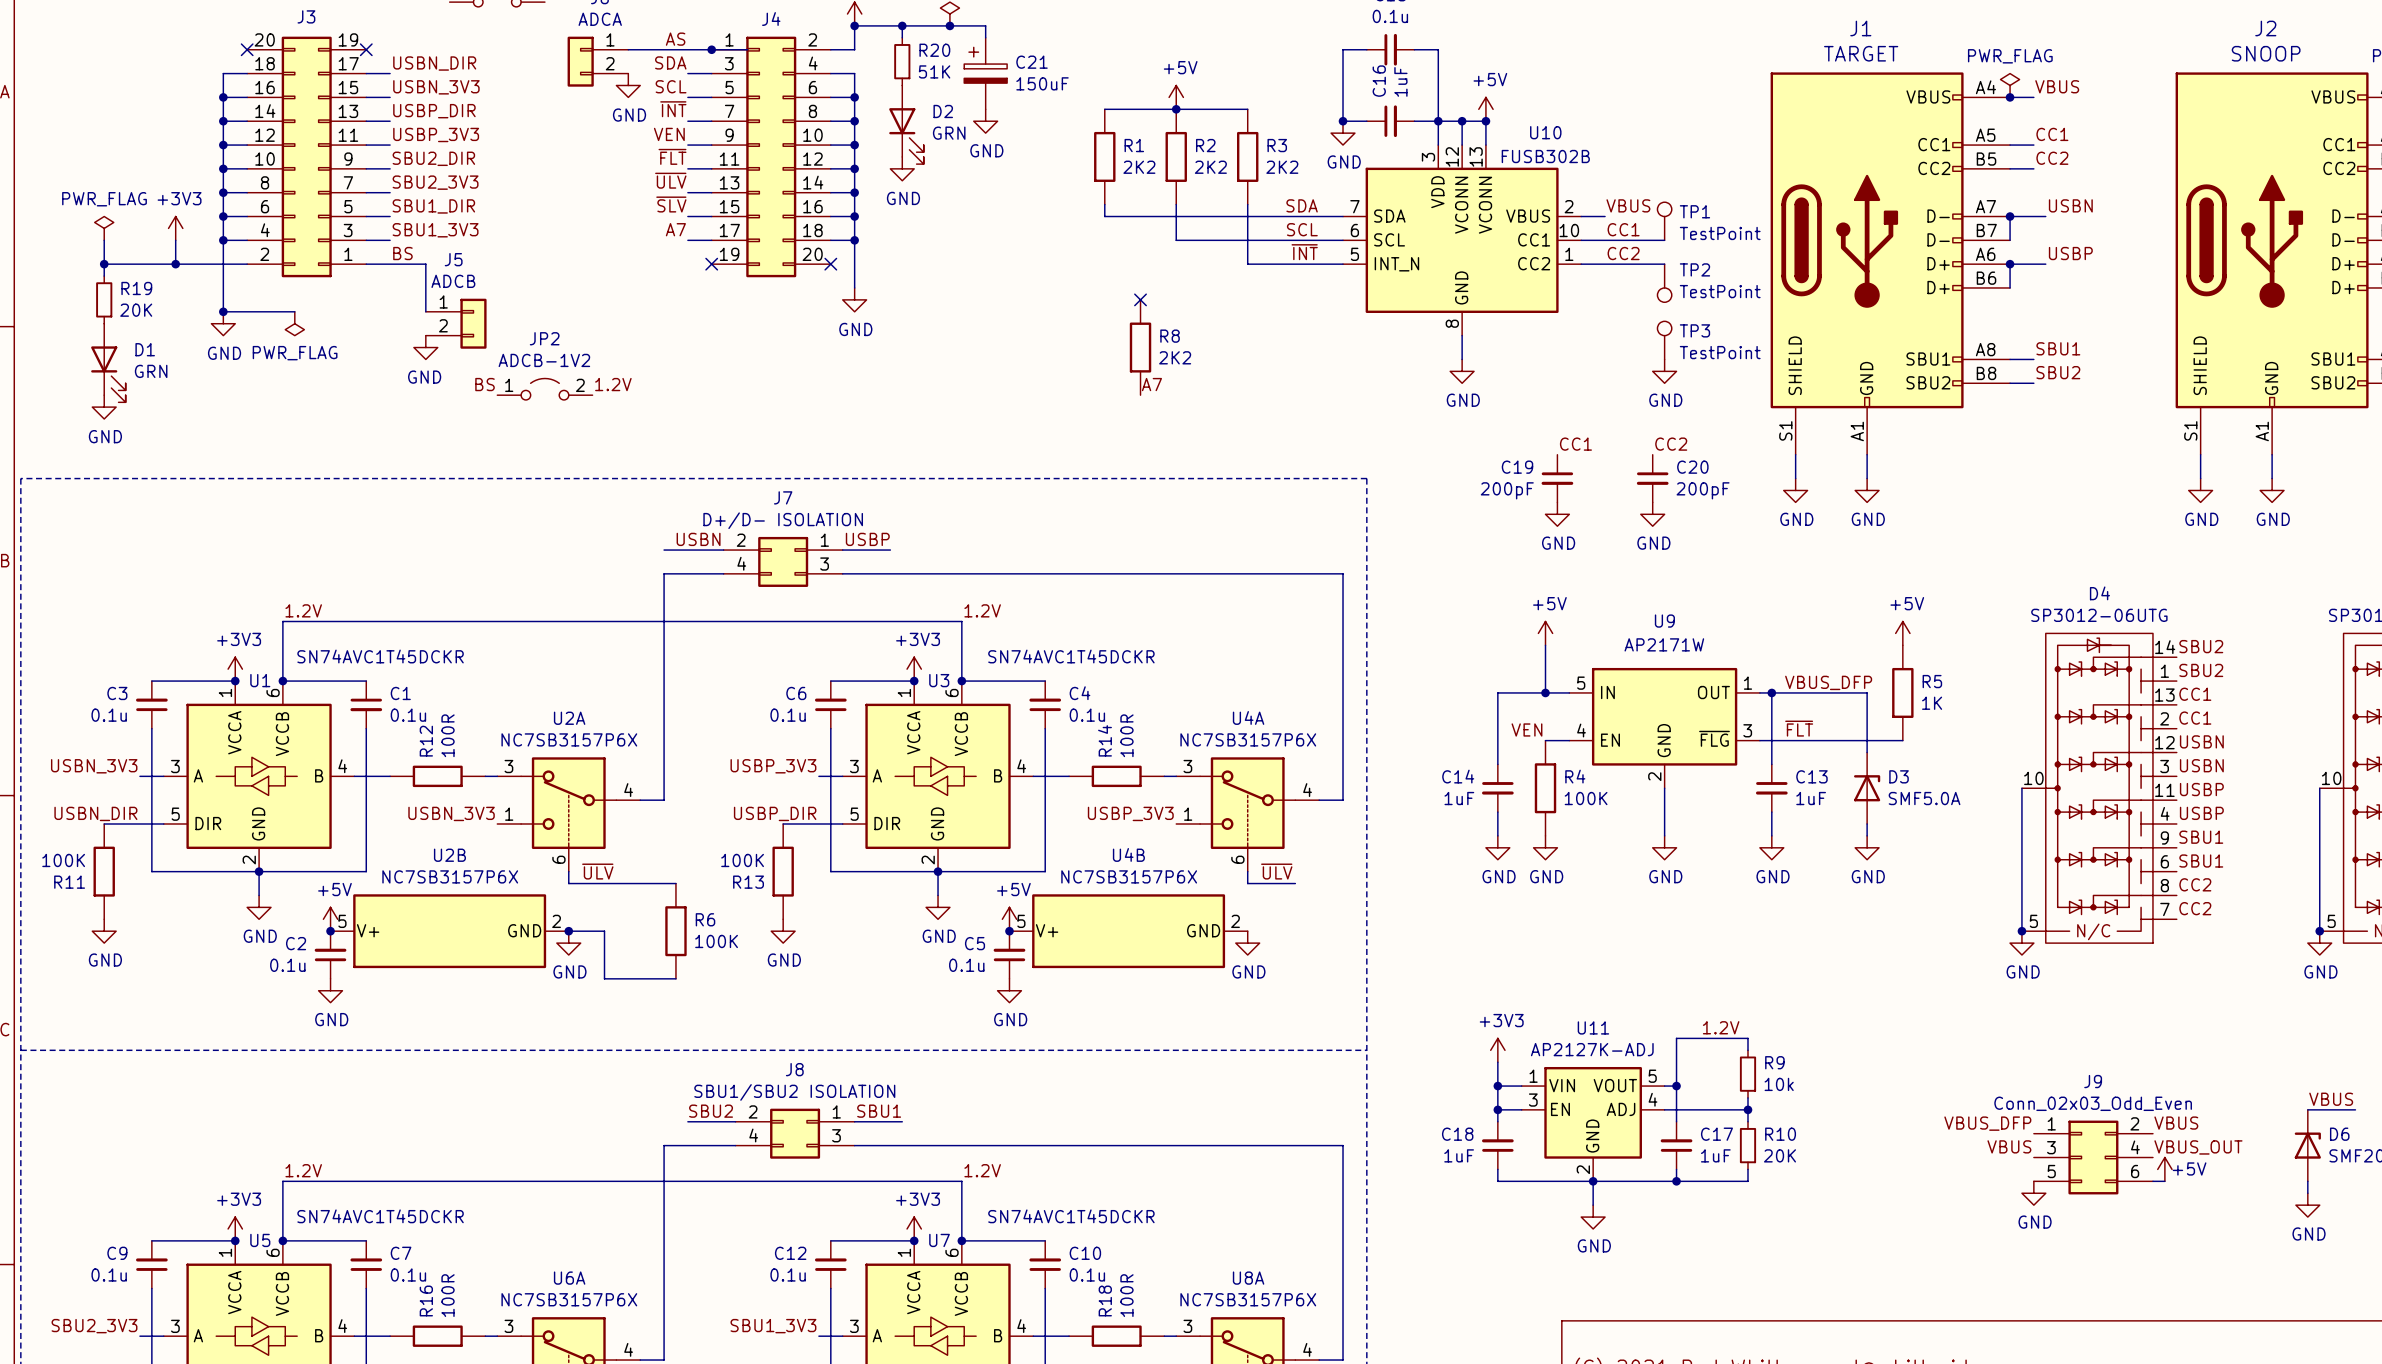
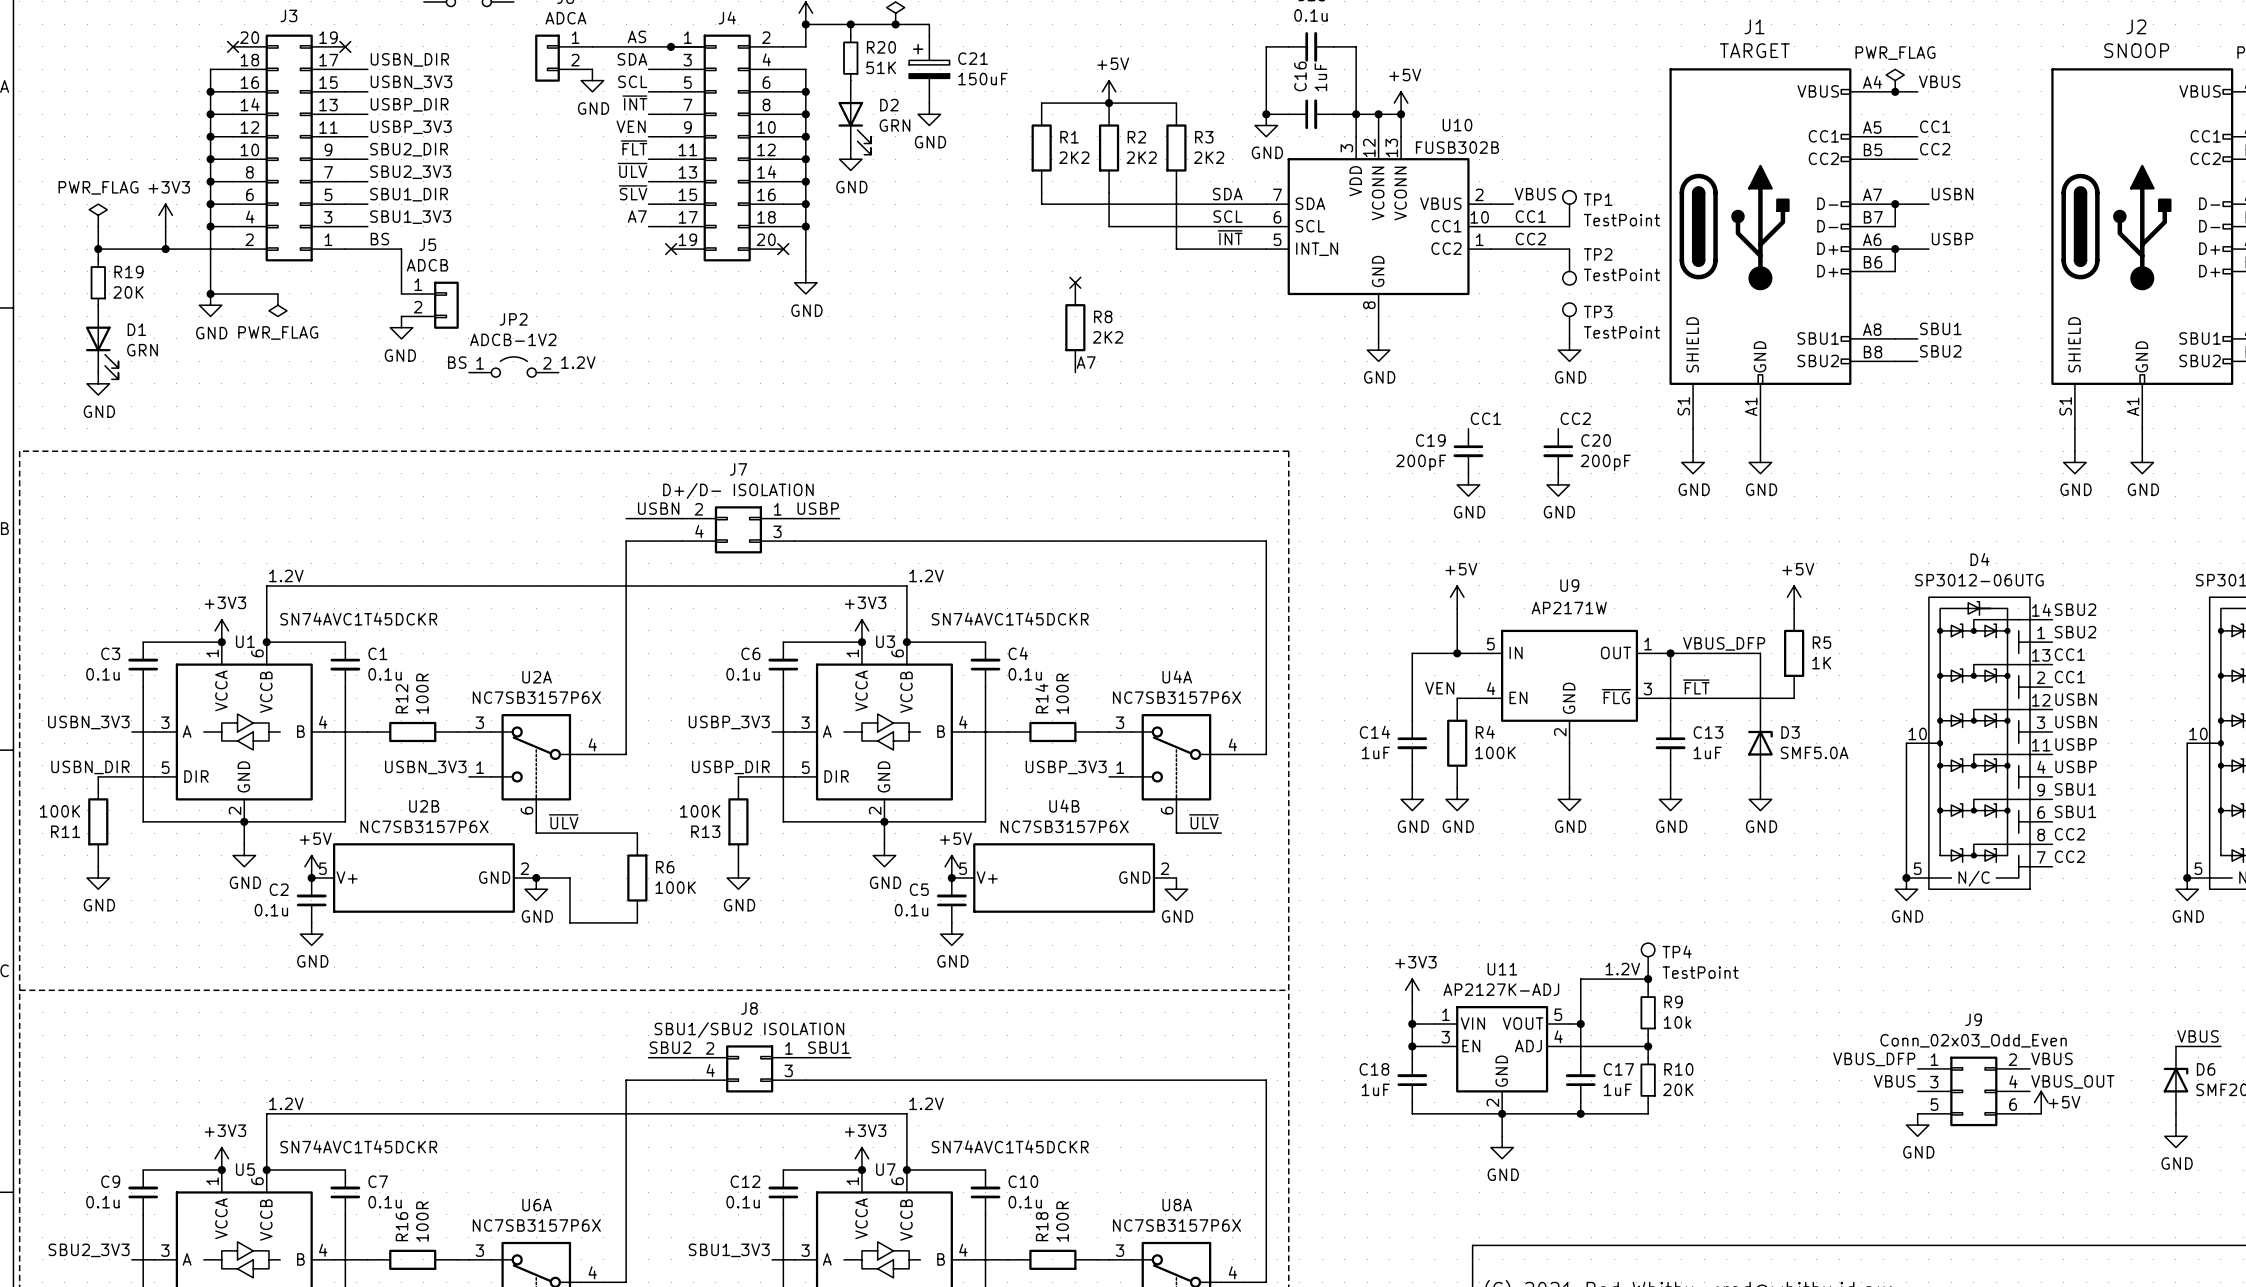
TP4: none -> TestPoint (1648, 961)
junction: none -> (1648, 979)

